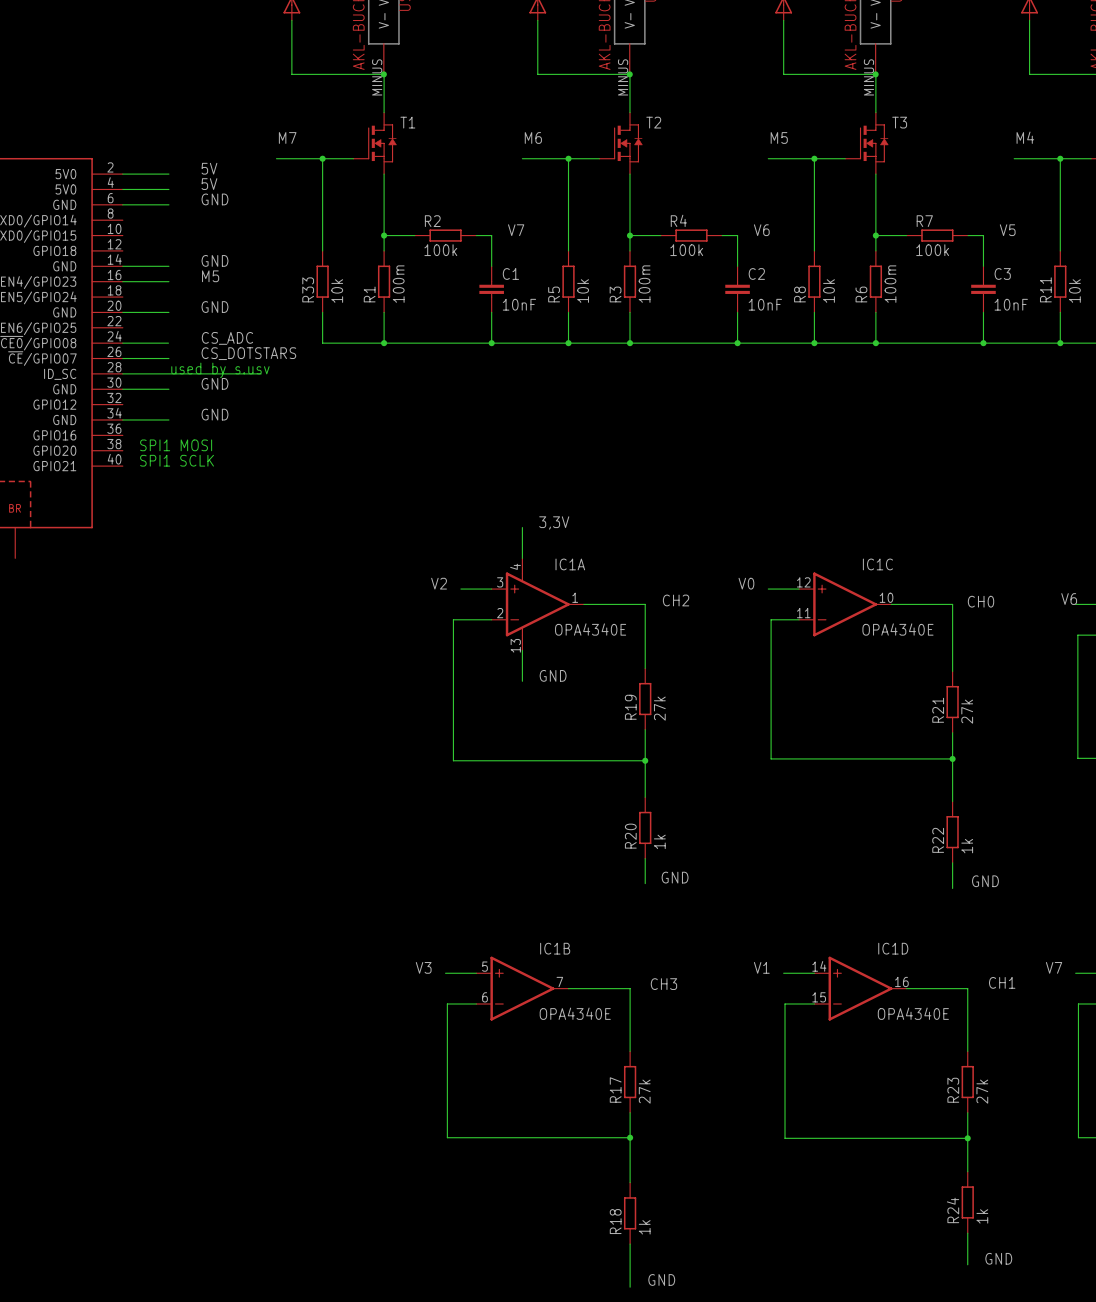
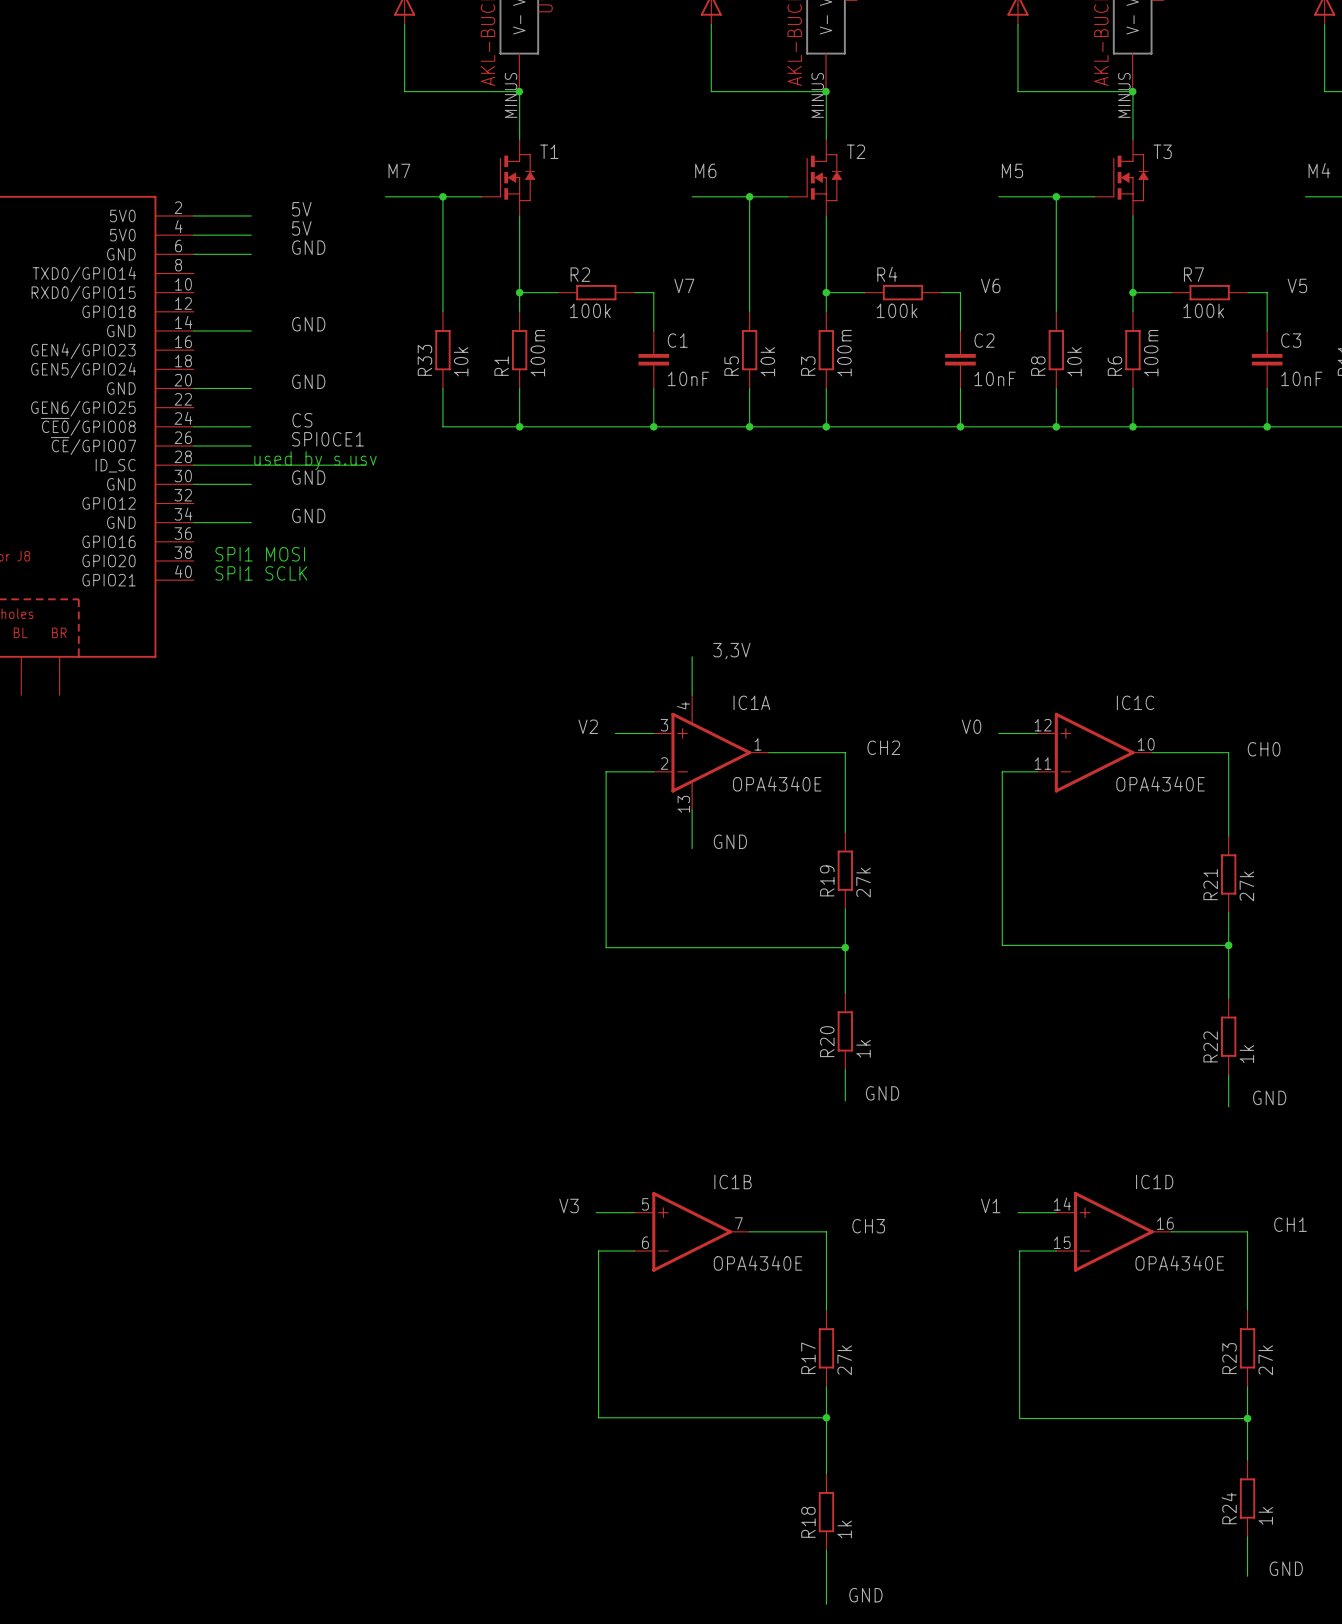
label: M5 (210, 276) -> none
wire: (122, 281) (168, 281) -> none
label: CS_ADC (227, 338) -> CS (302, 420)
label: CS_DOTSTARS (248, 353) -> SPI0CE1 (327, 439)

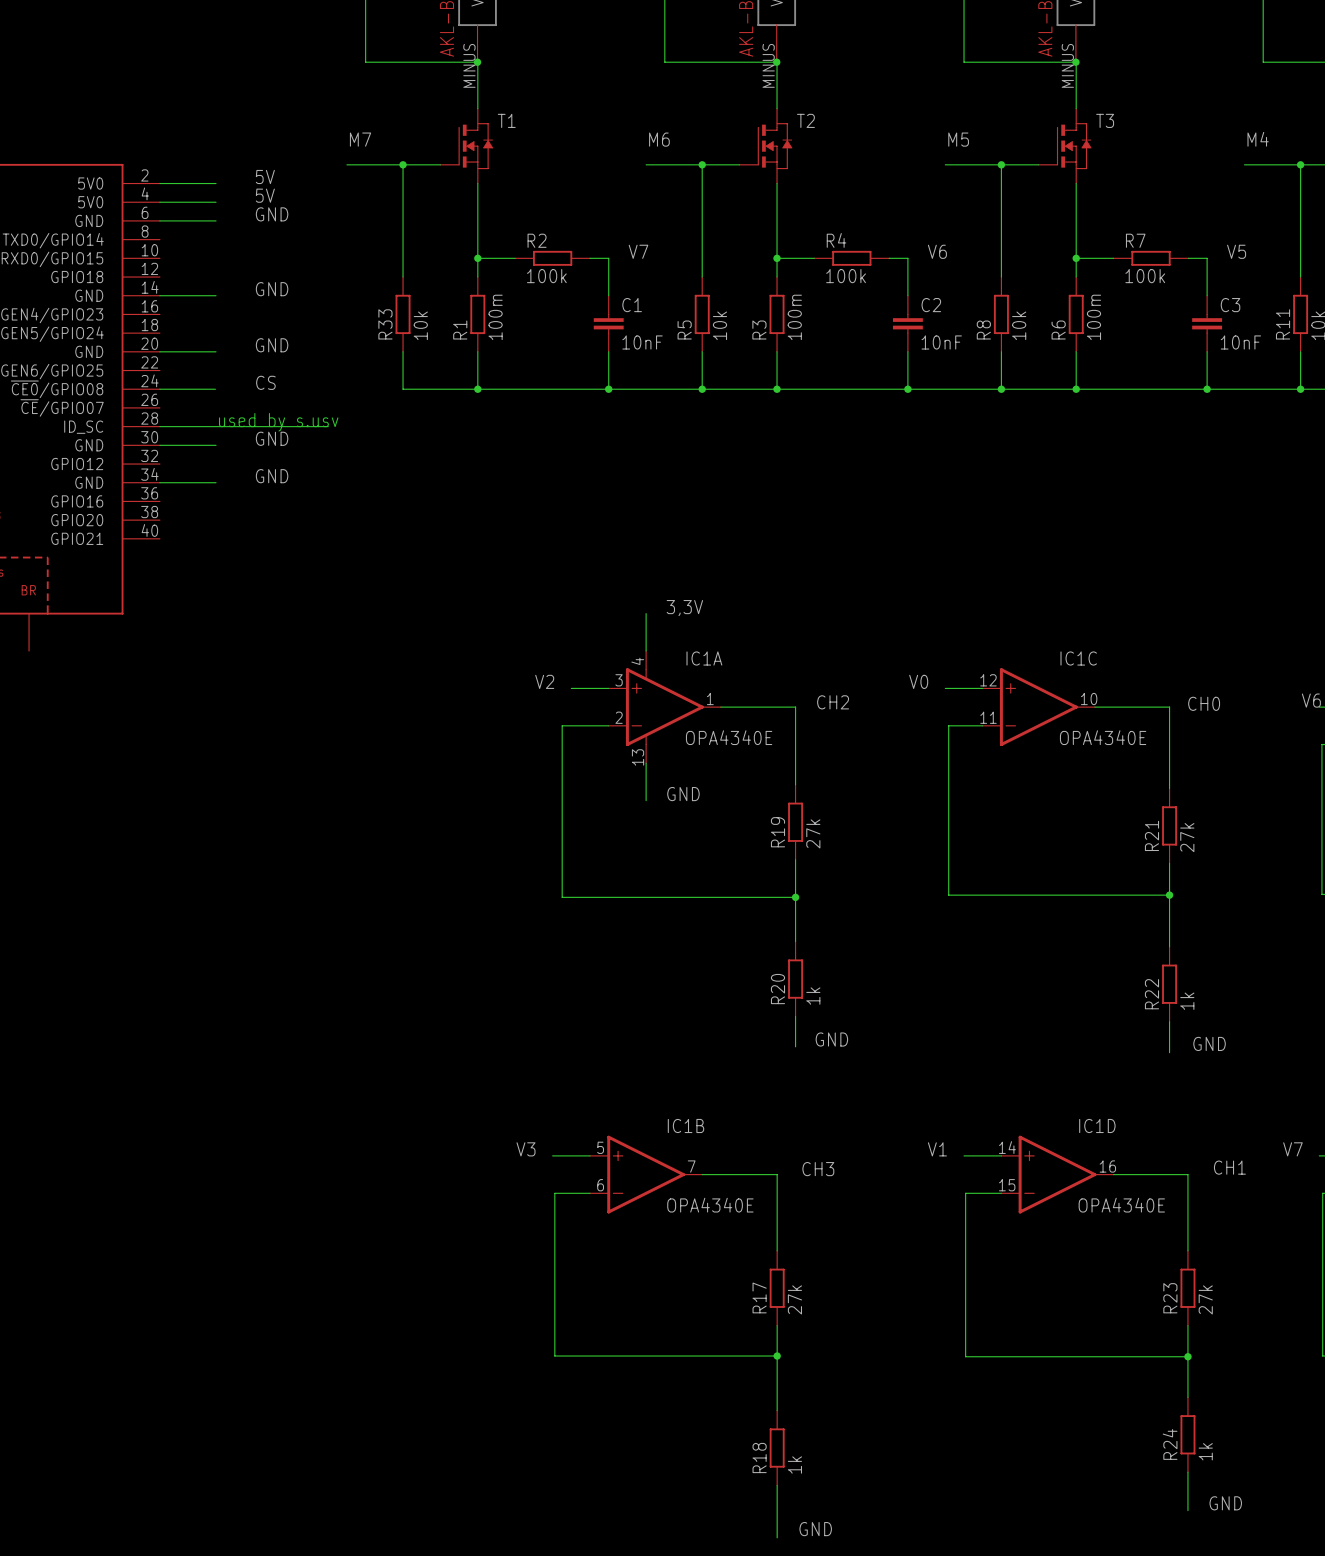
label: SPI0CE1 (327, 439) -> none
wire: (193, 445) (251, 445) -> none
text: SPI1 MOSI (260, 554) -> none
text: SPI1 SCLK (261, 573) -> none

